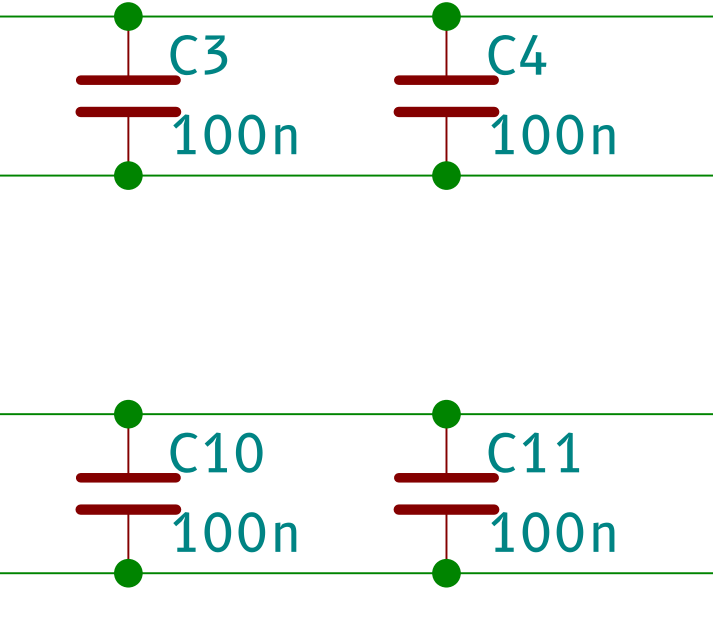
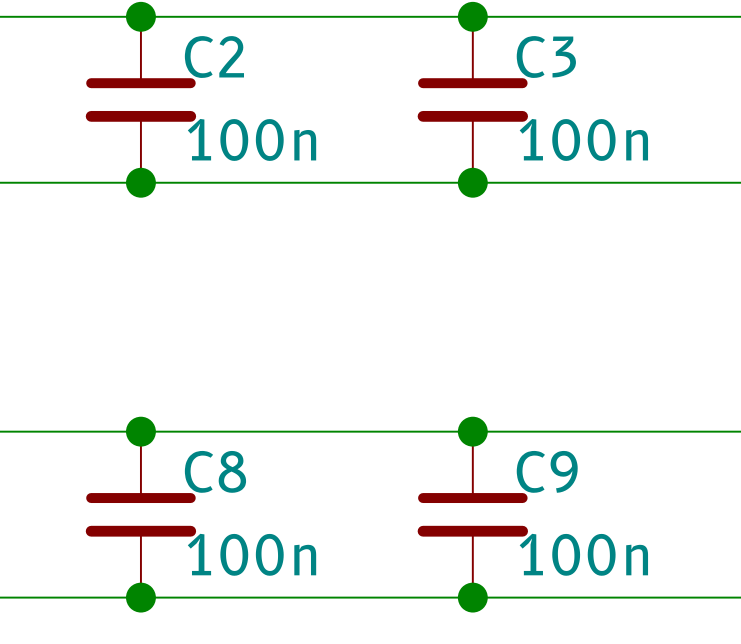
C3 name: C3 (198, 55) -> C2 (214, 57)
C4 name: C4 (517, 55) -> C3 (546, 57)
C10 name: C10 (216, 452) -> C8 (215, 471)
C11 name: C11 (533, 452) -> C9 (547, 471)

